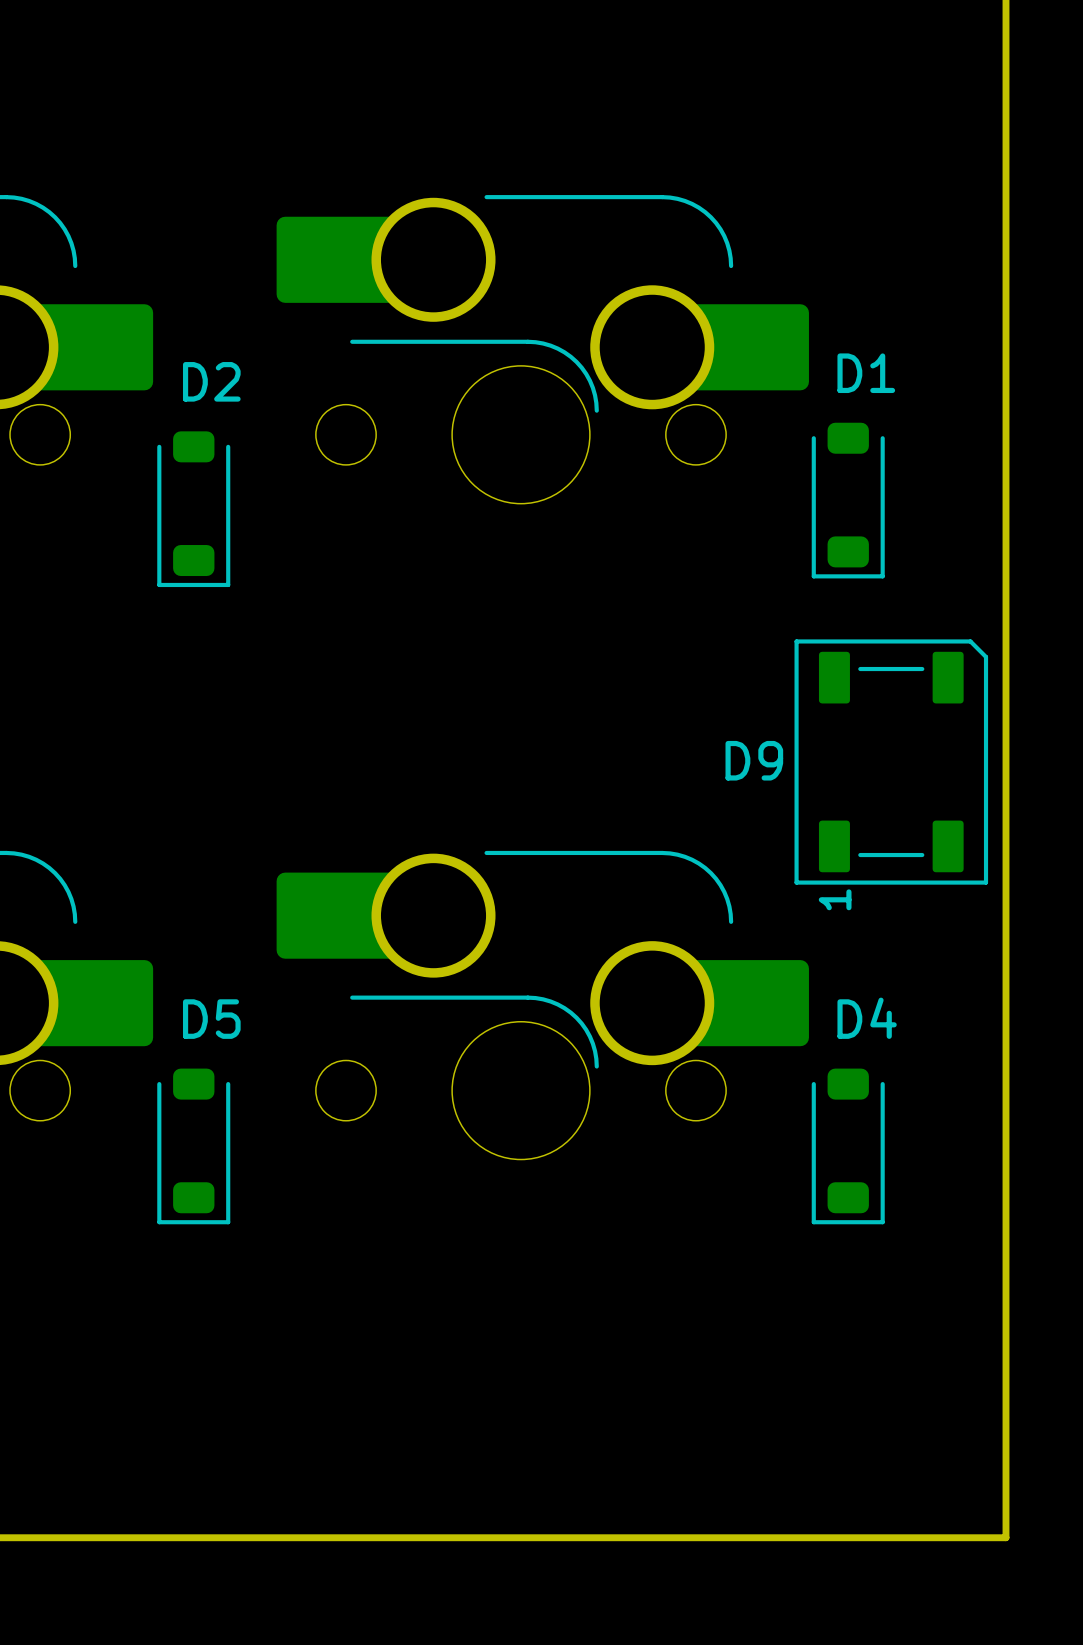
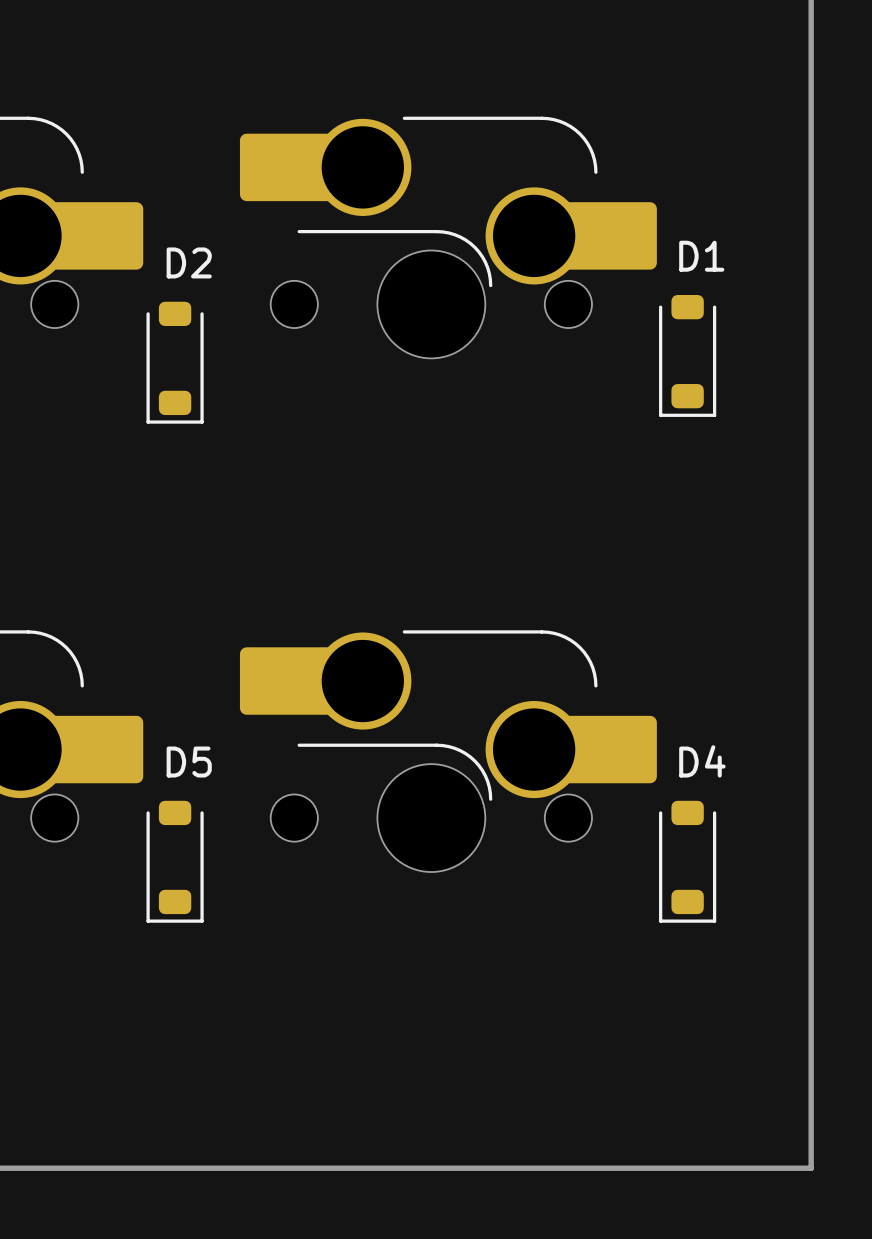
D9: (891, 762) -> none

